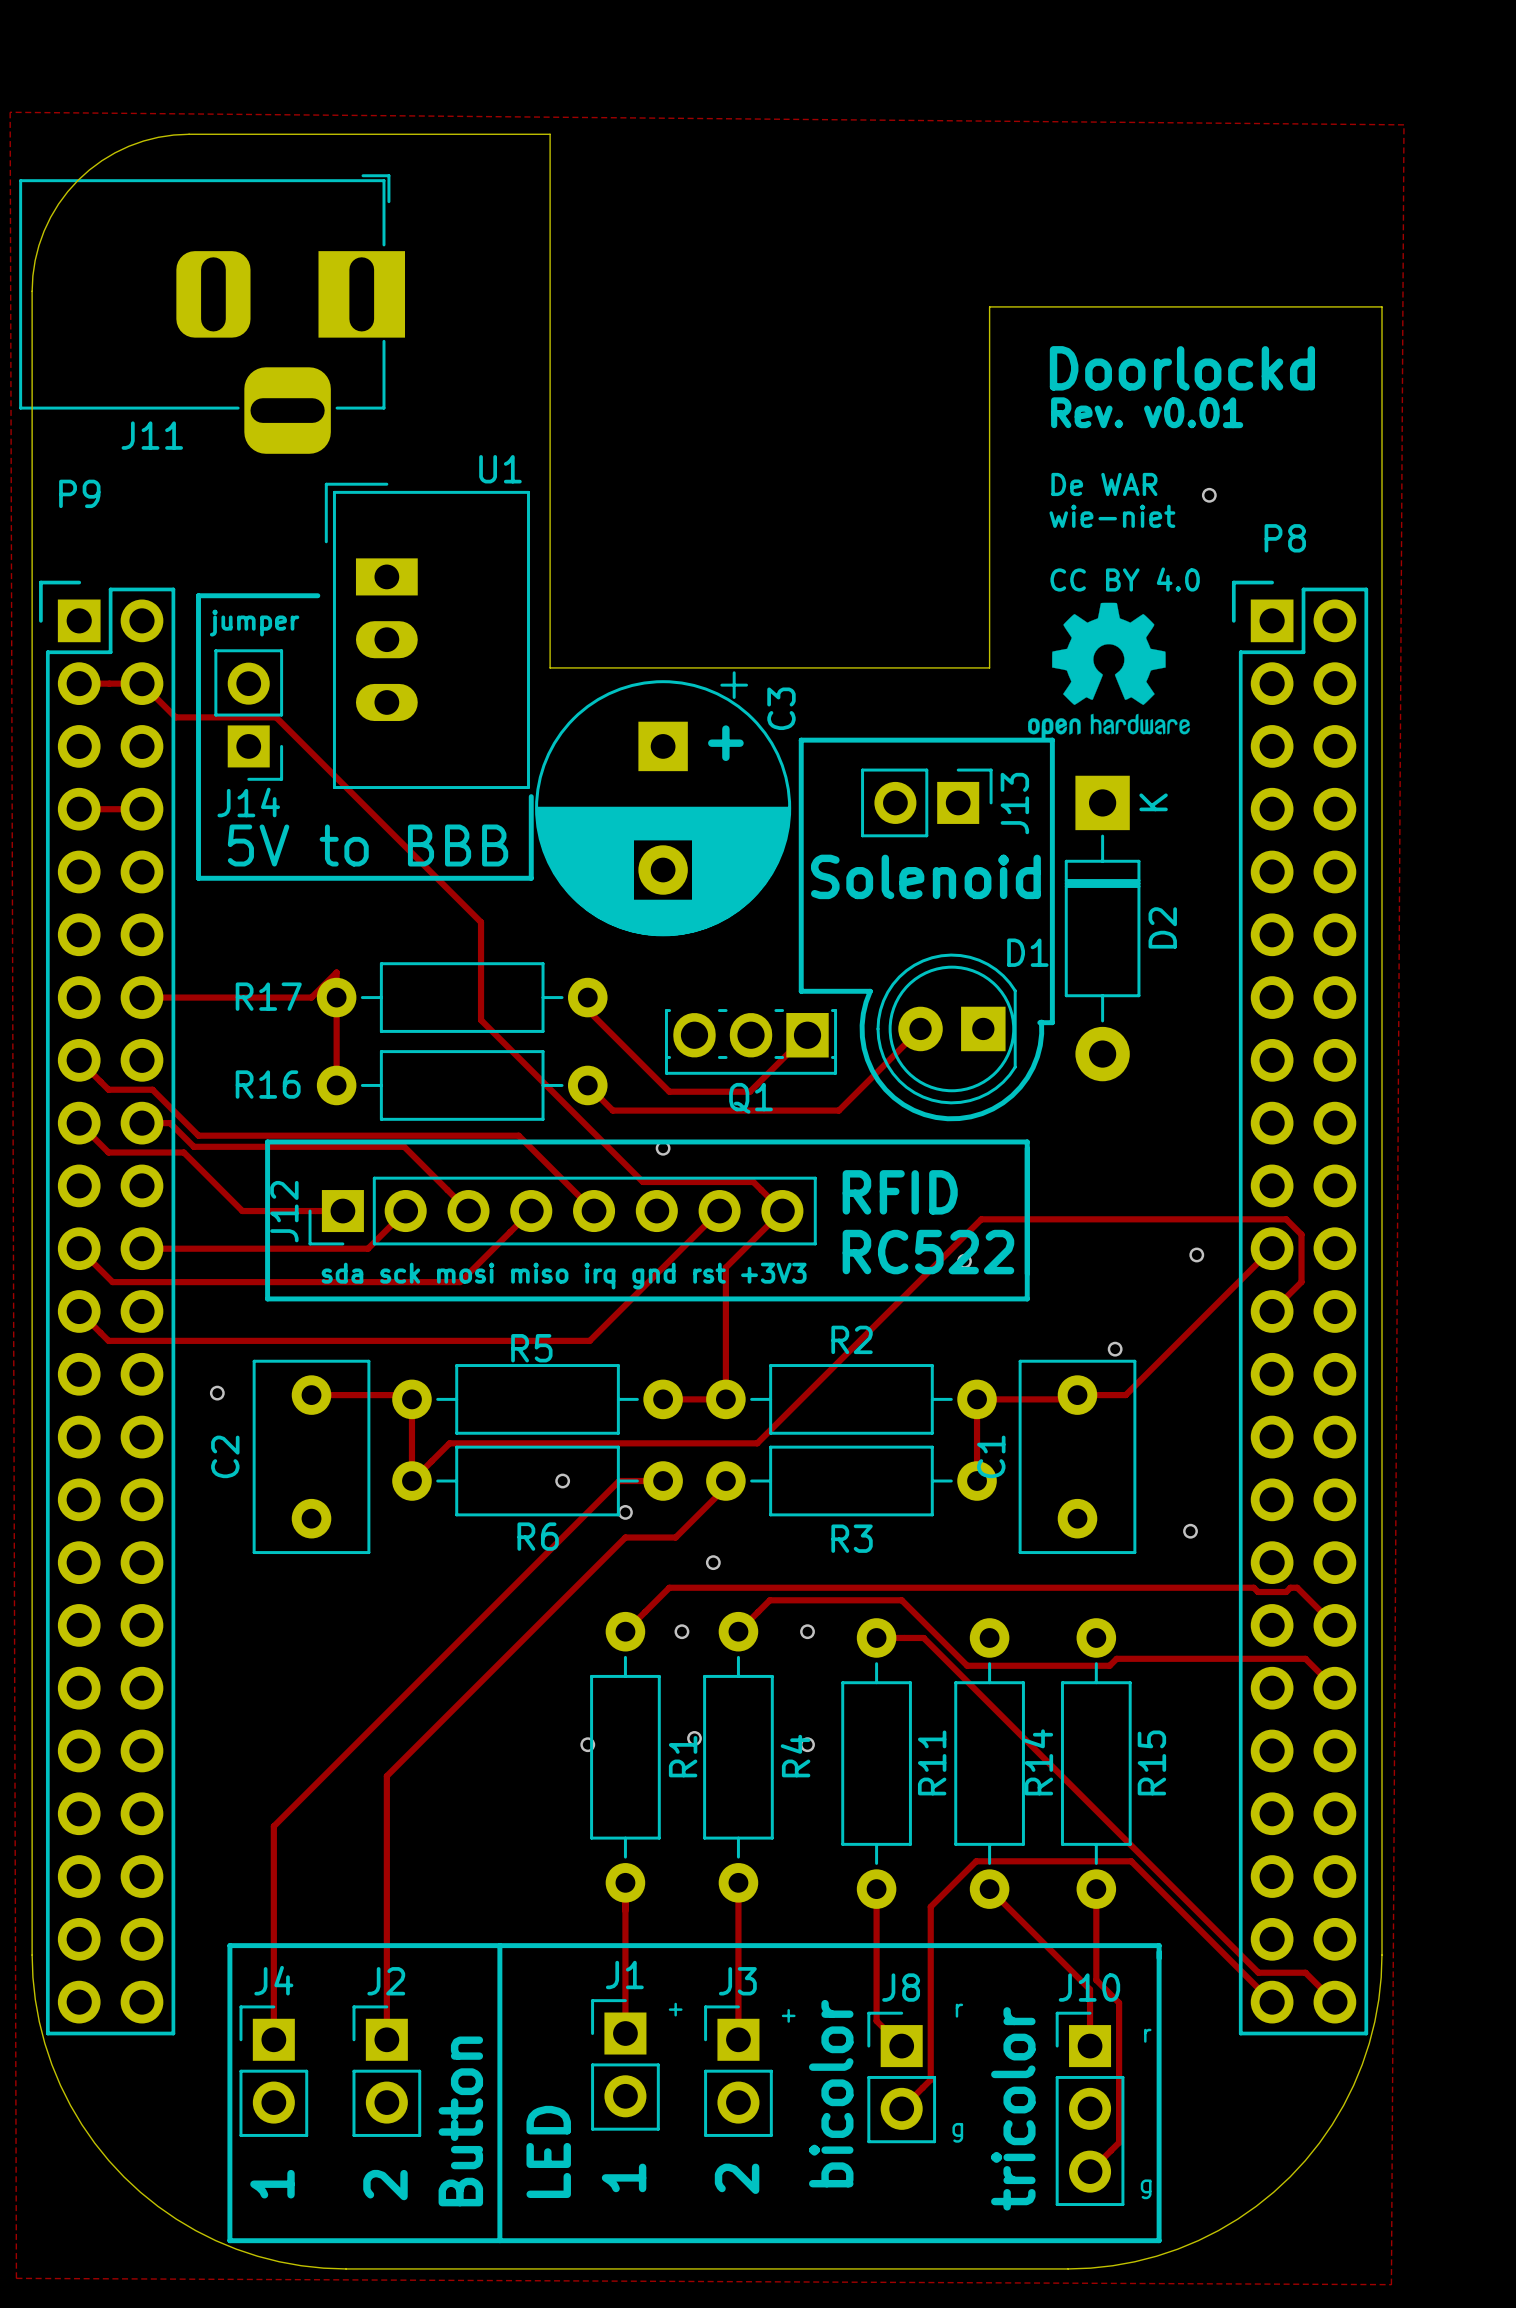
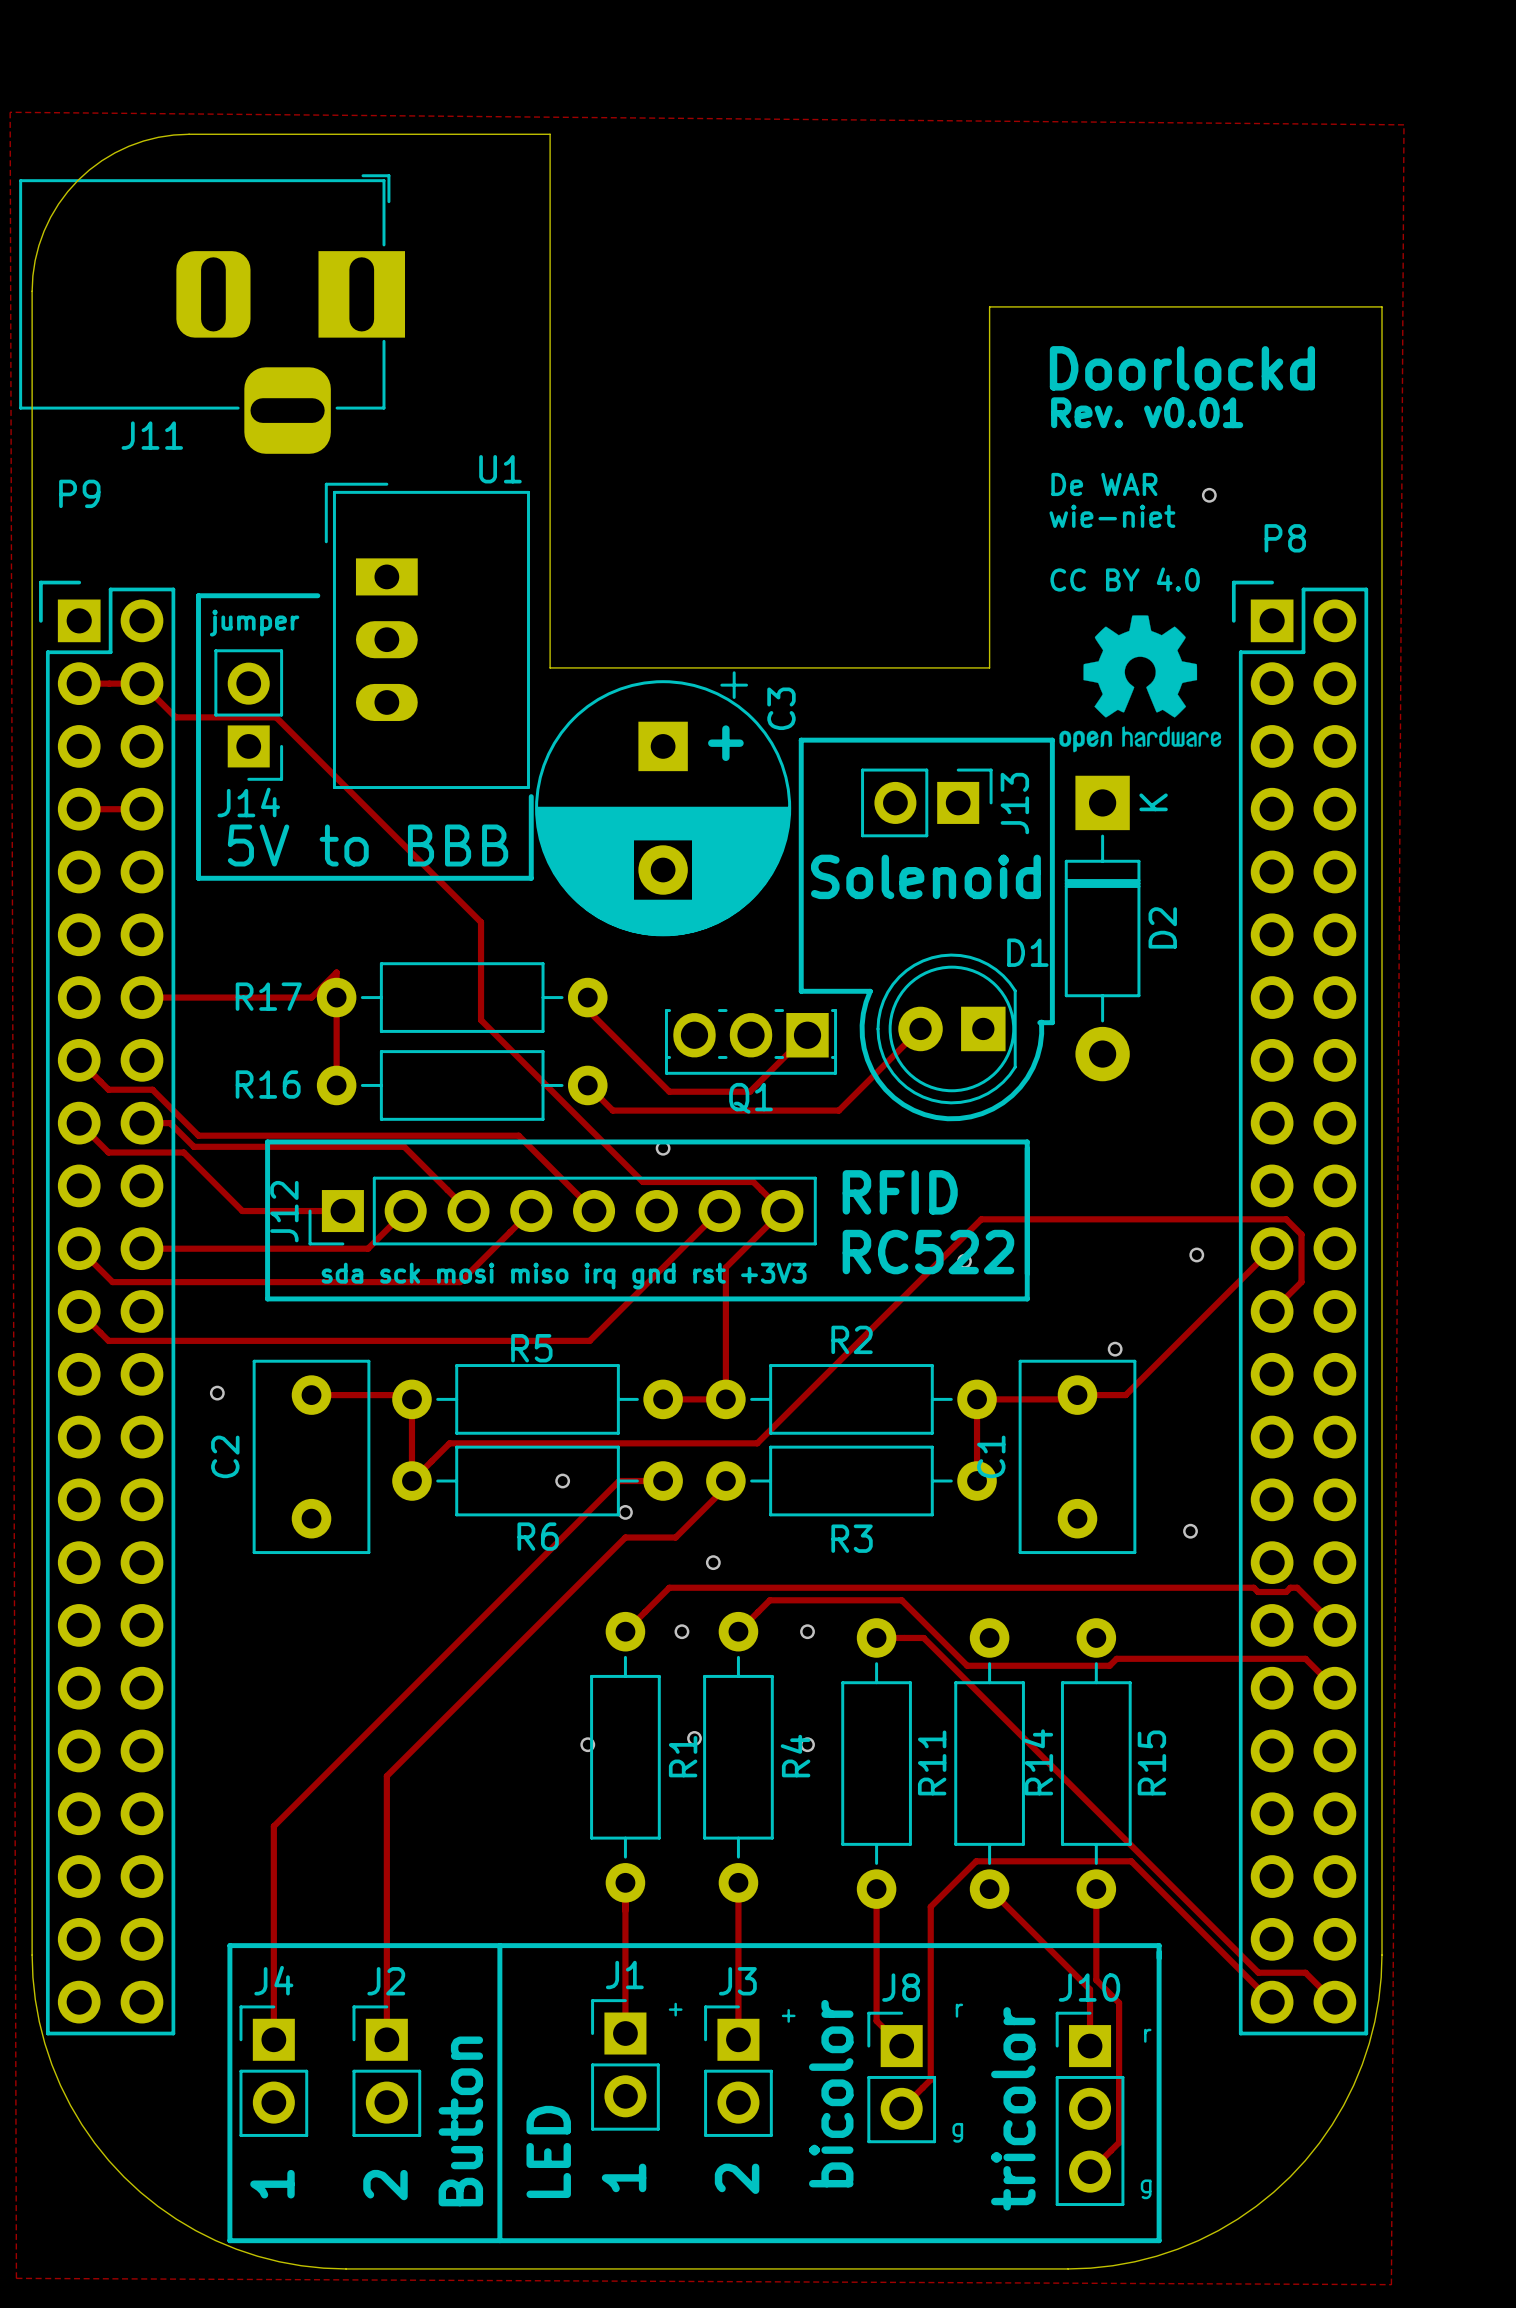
drawing position: (1108, 671) -> (1140, 683)

